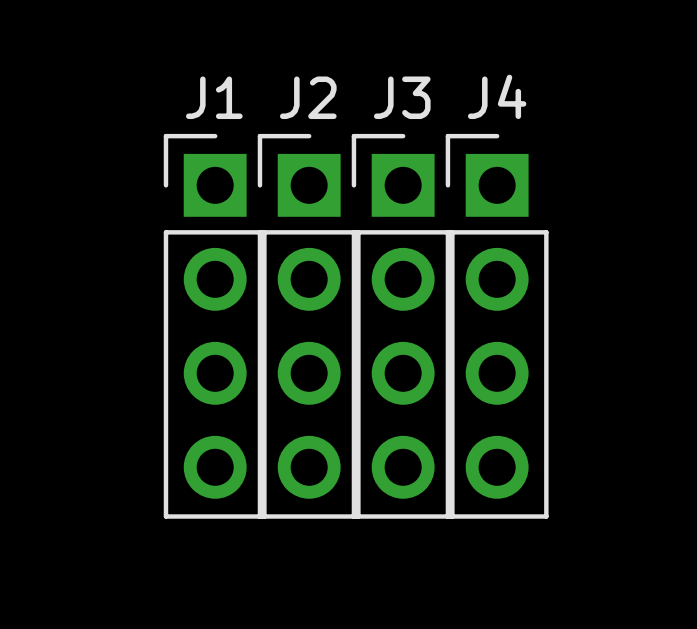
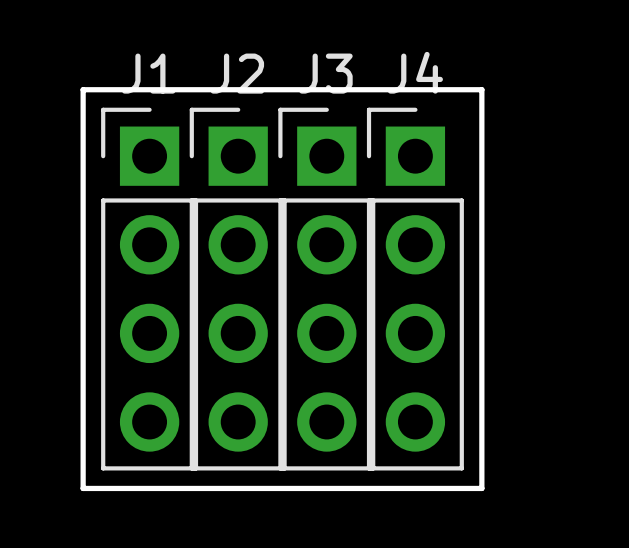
board edge: none -> (83, 89) (83, 488) (481, 488) (481, 89) (83, 89)

